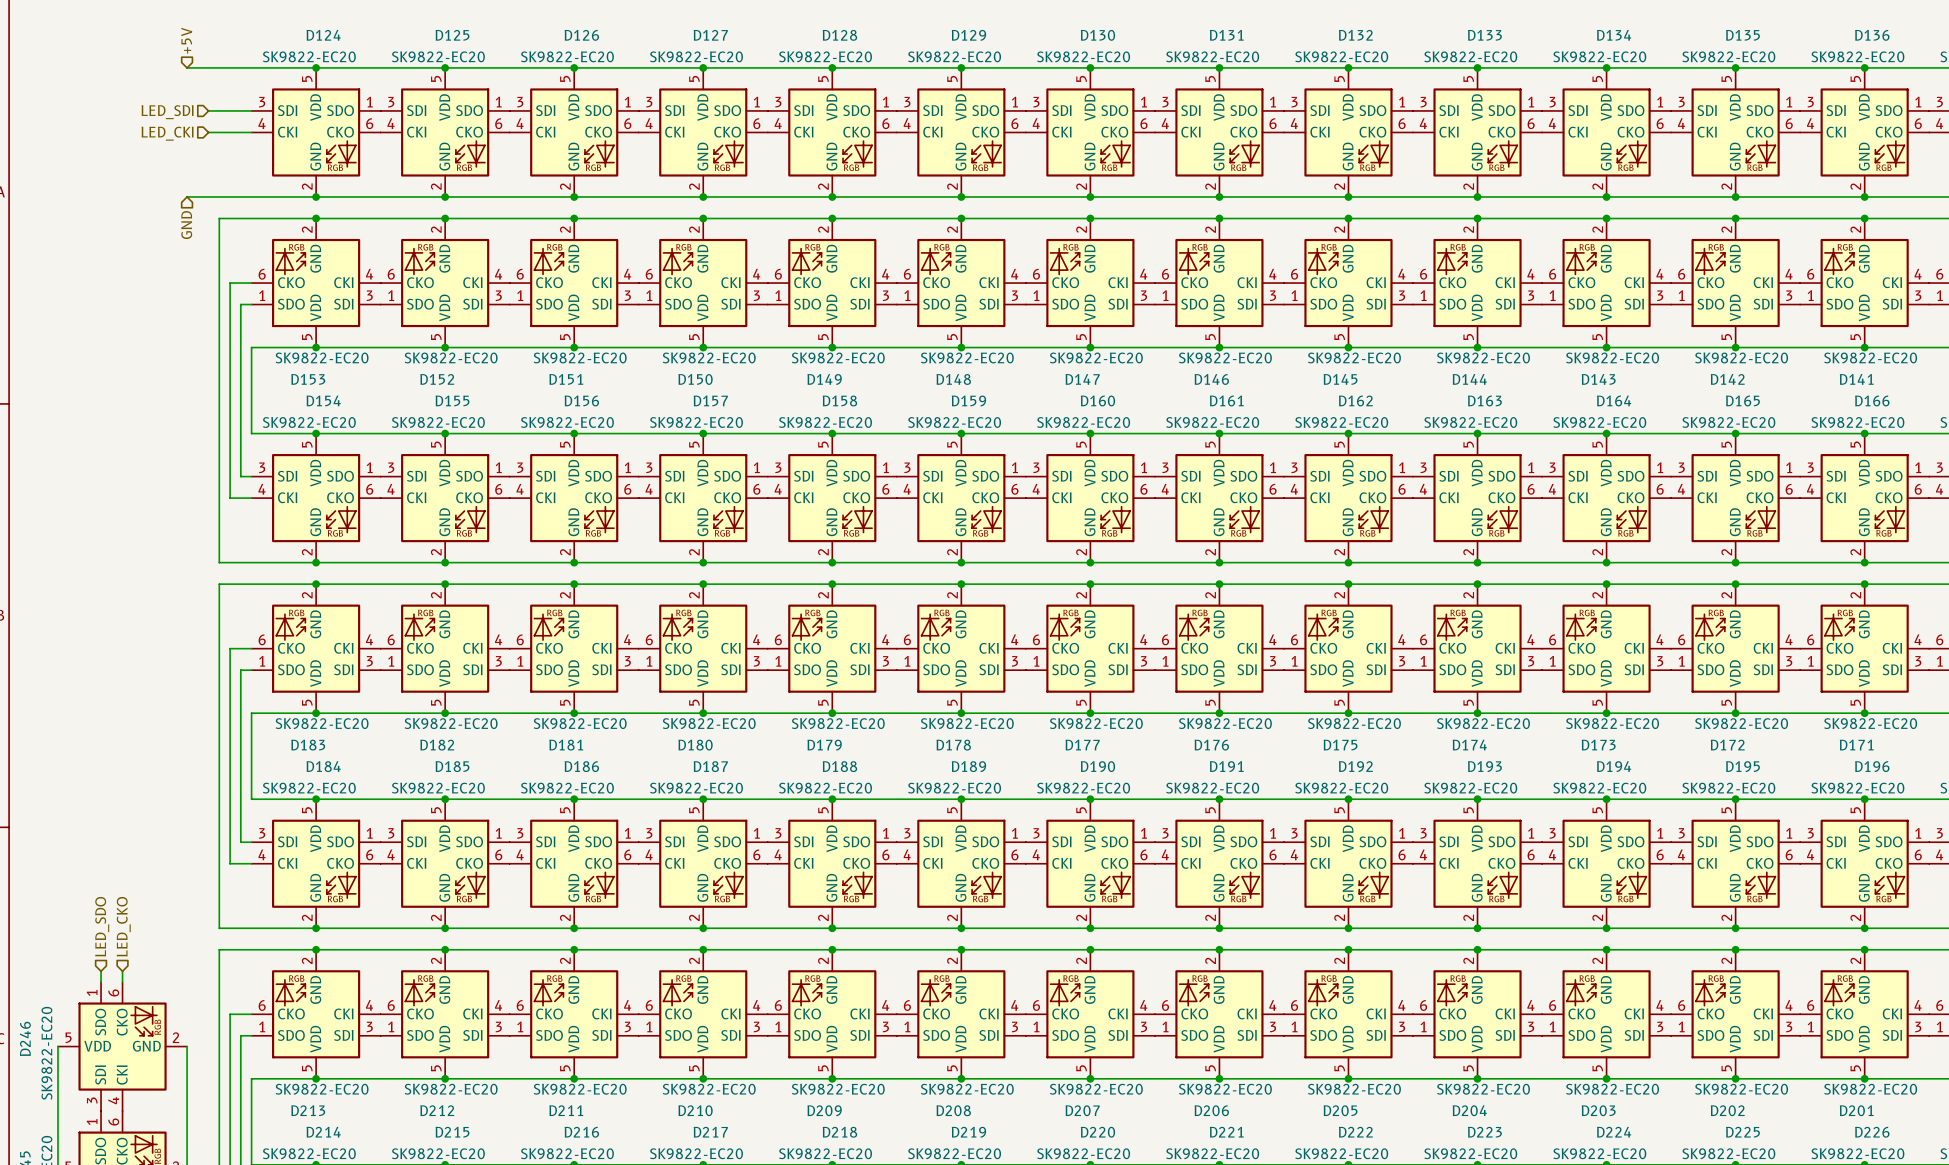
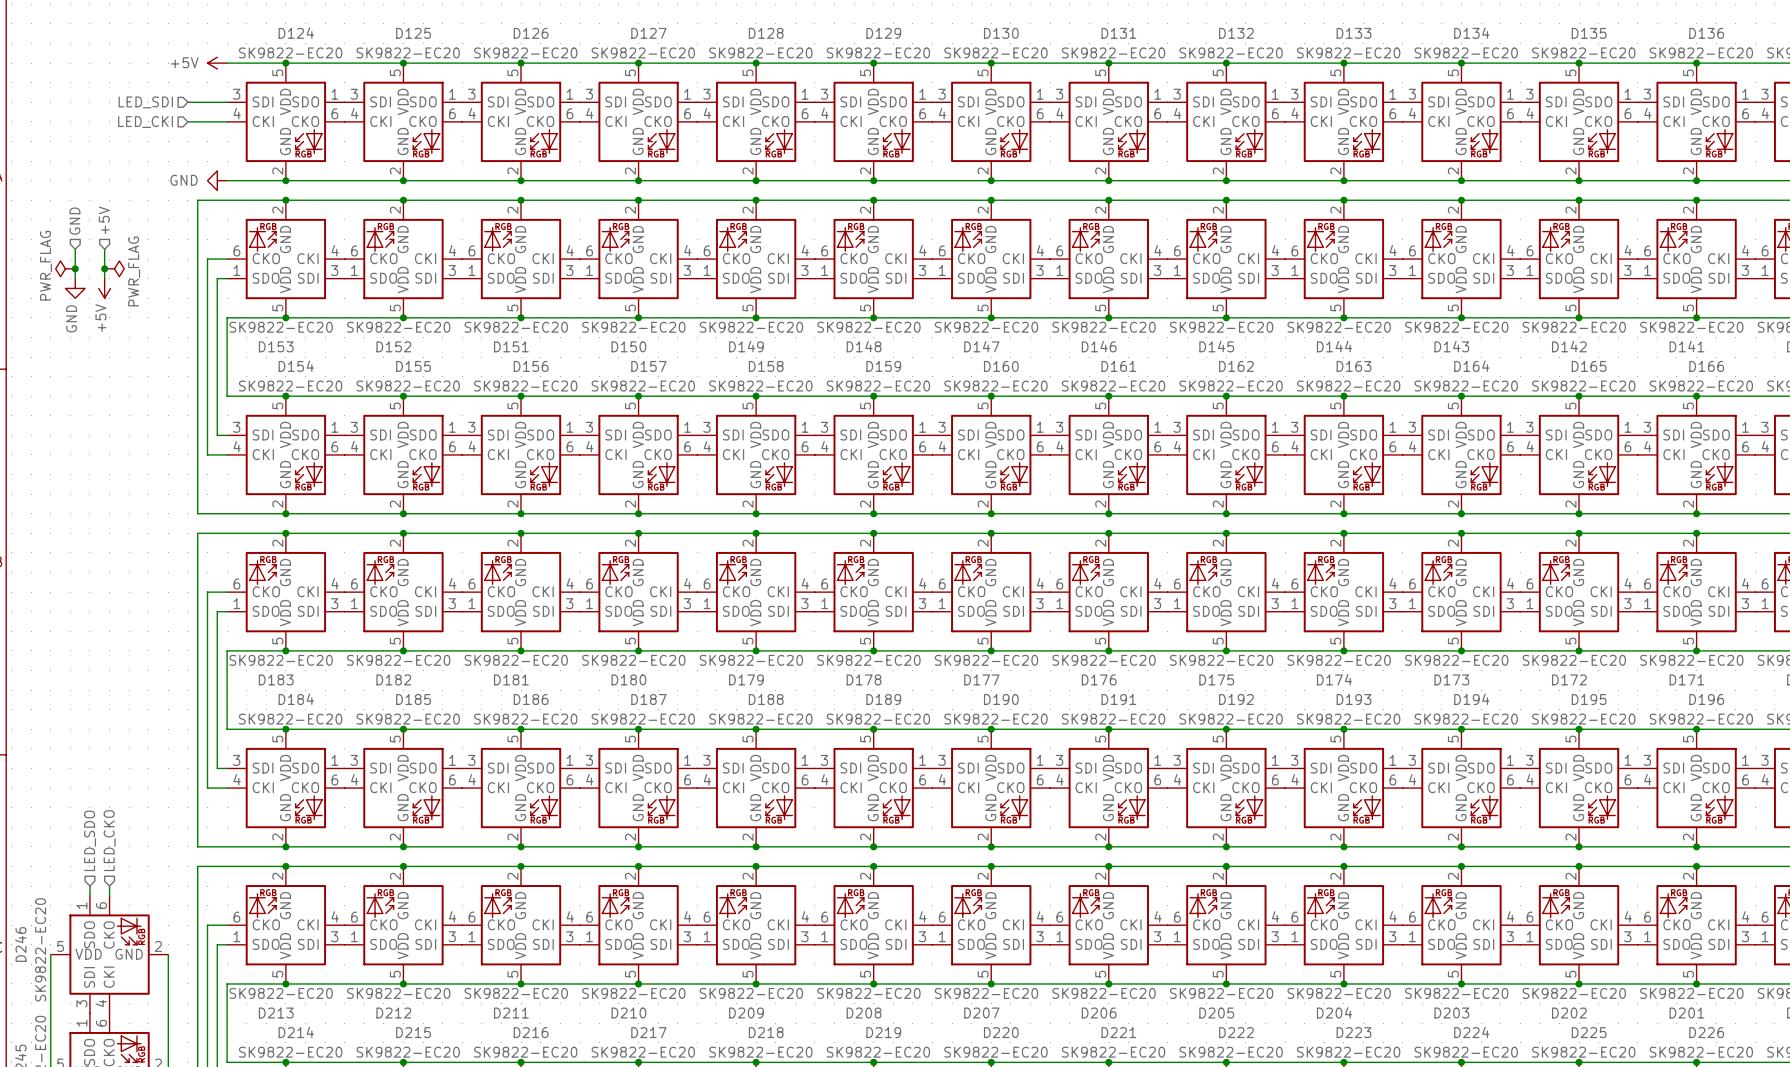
hierarchical label: +5V (186, 40) -> none
wire: (187, 67) (251, 67) -> none
power symbol: none -> +5V (217, 63)
wire: (187, 197) (251, 197) -> none
power symbol: none -> GND (217, 180)
hierarchical label rotation: 0° (186, 225) -> 180° (74, 221)
hierarchical label position: GND (186, 225) -> GND (74, 221)
hierarchical label: none -> +5V (104, 220)
wire: none -> (75, 249) (75, 278)
wire: none -> (104, 249) (104, 278)
power symbol: none -> PWR_FLAG (65, 268)
junction: none -> (75, 268)
junction: none -> (104, 268)
power symbol: none -> PWR_FLAG (114, 268)
power symbol: none -> GND (75, 288)
power symbol: none -> +5V (104, 288)

